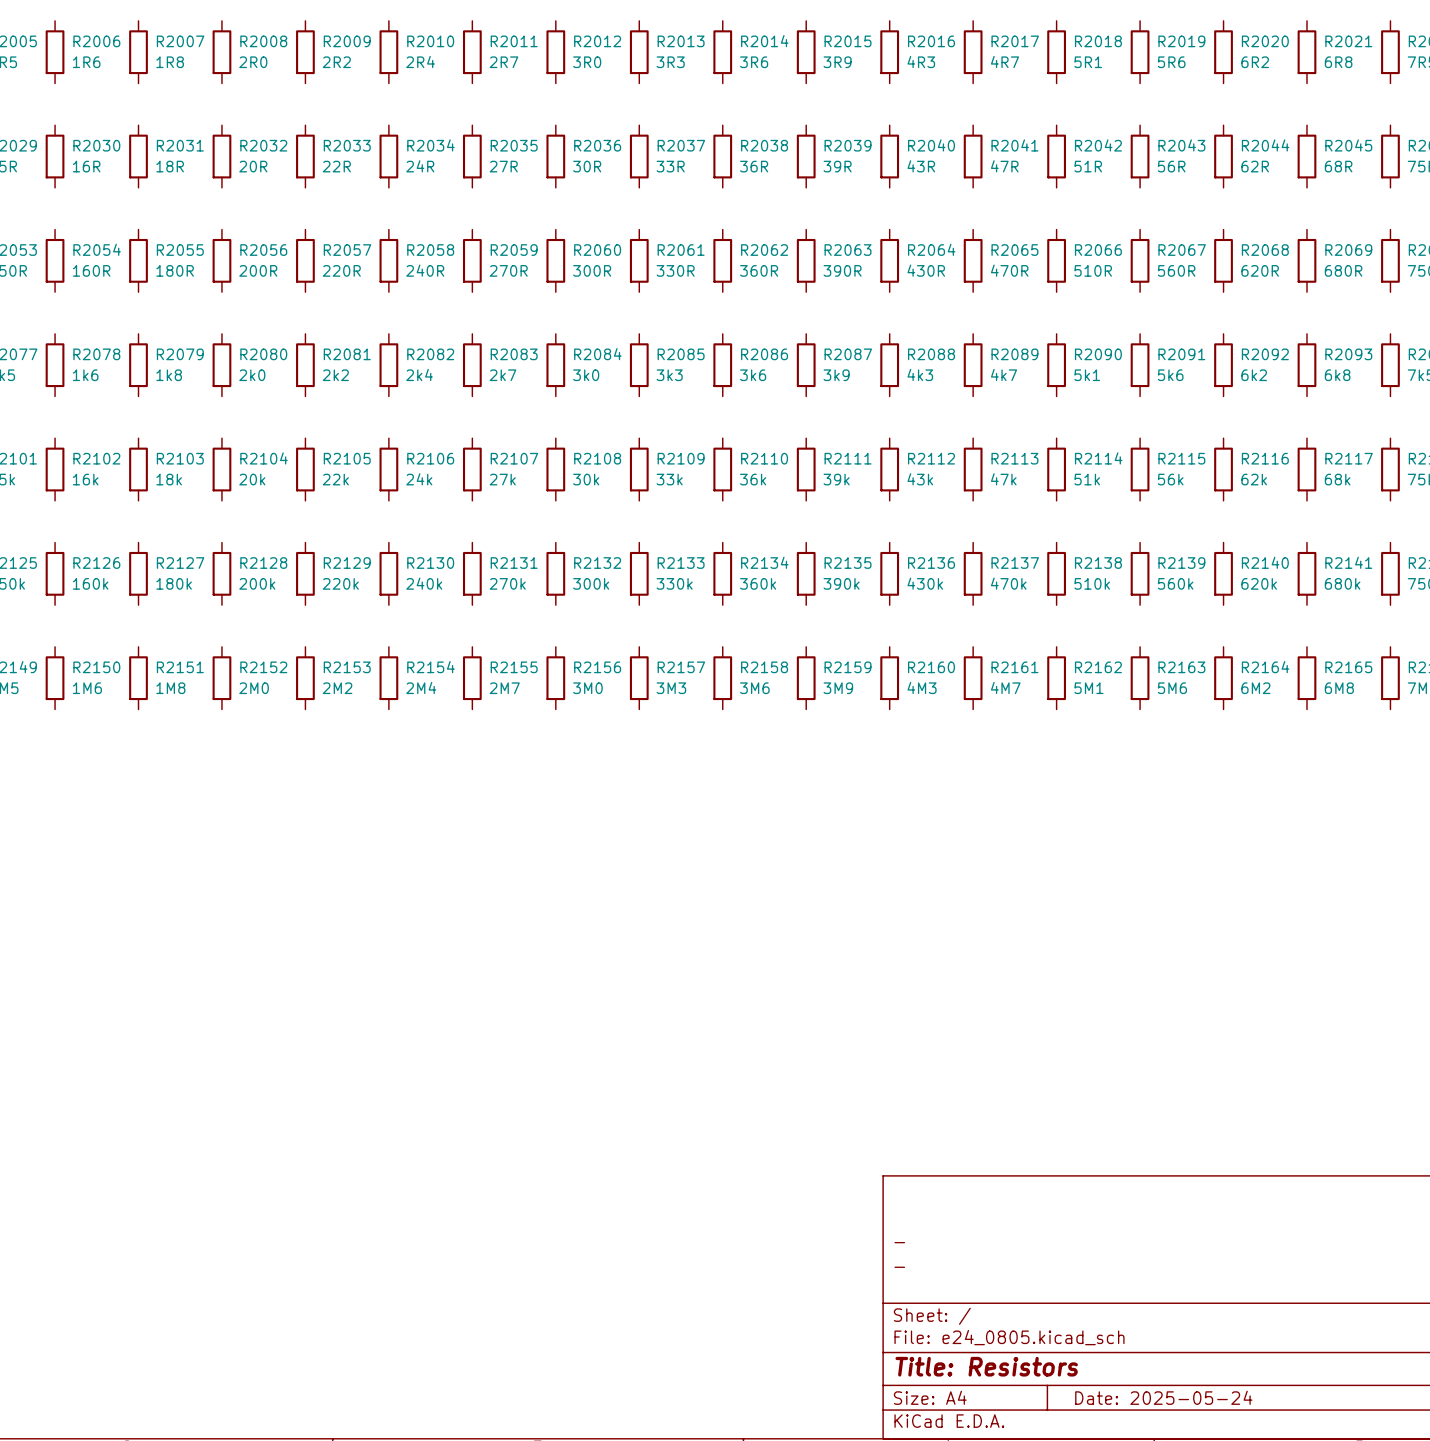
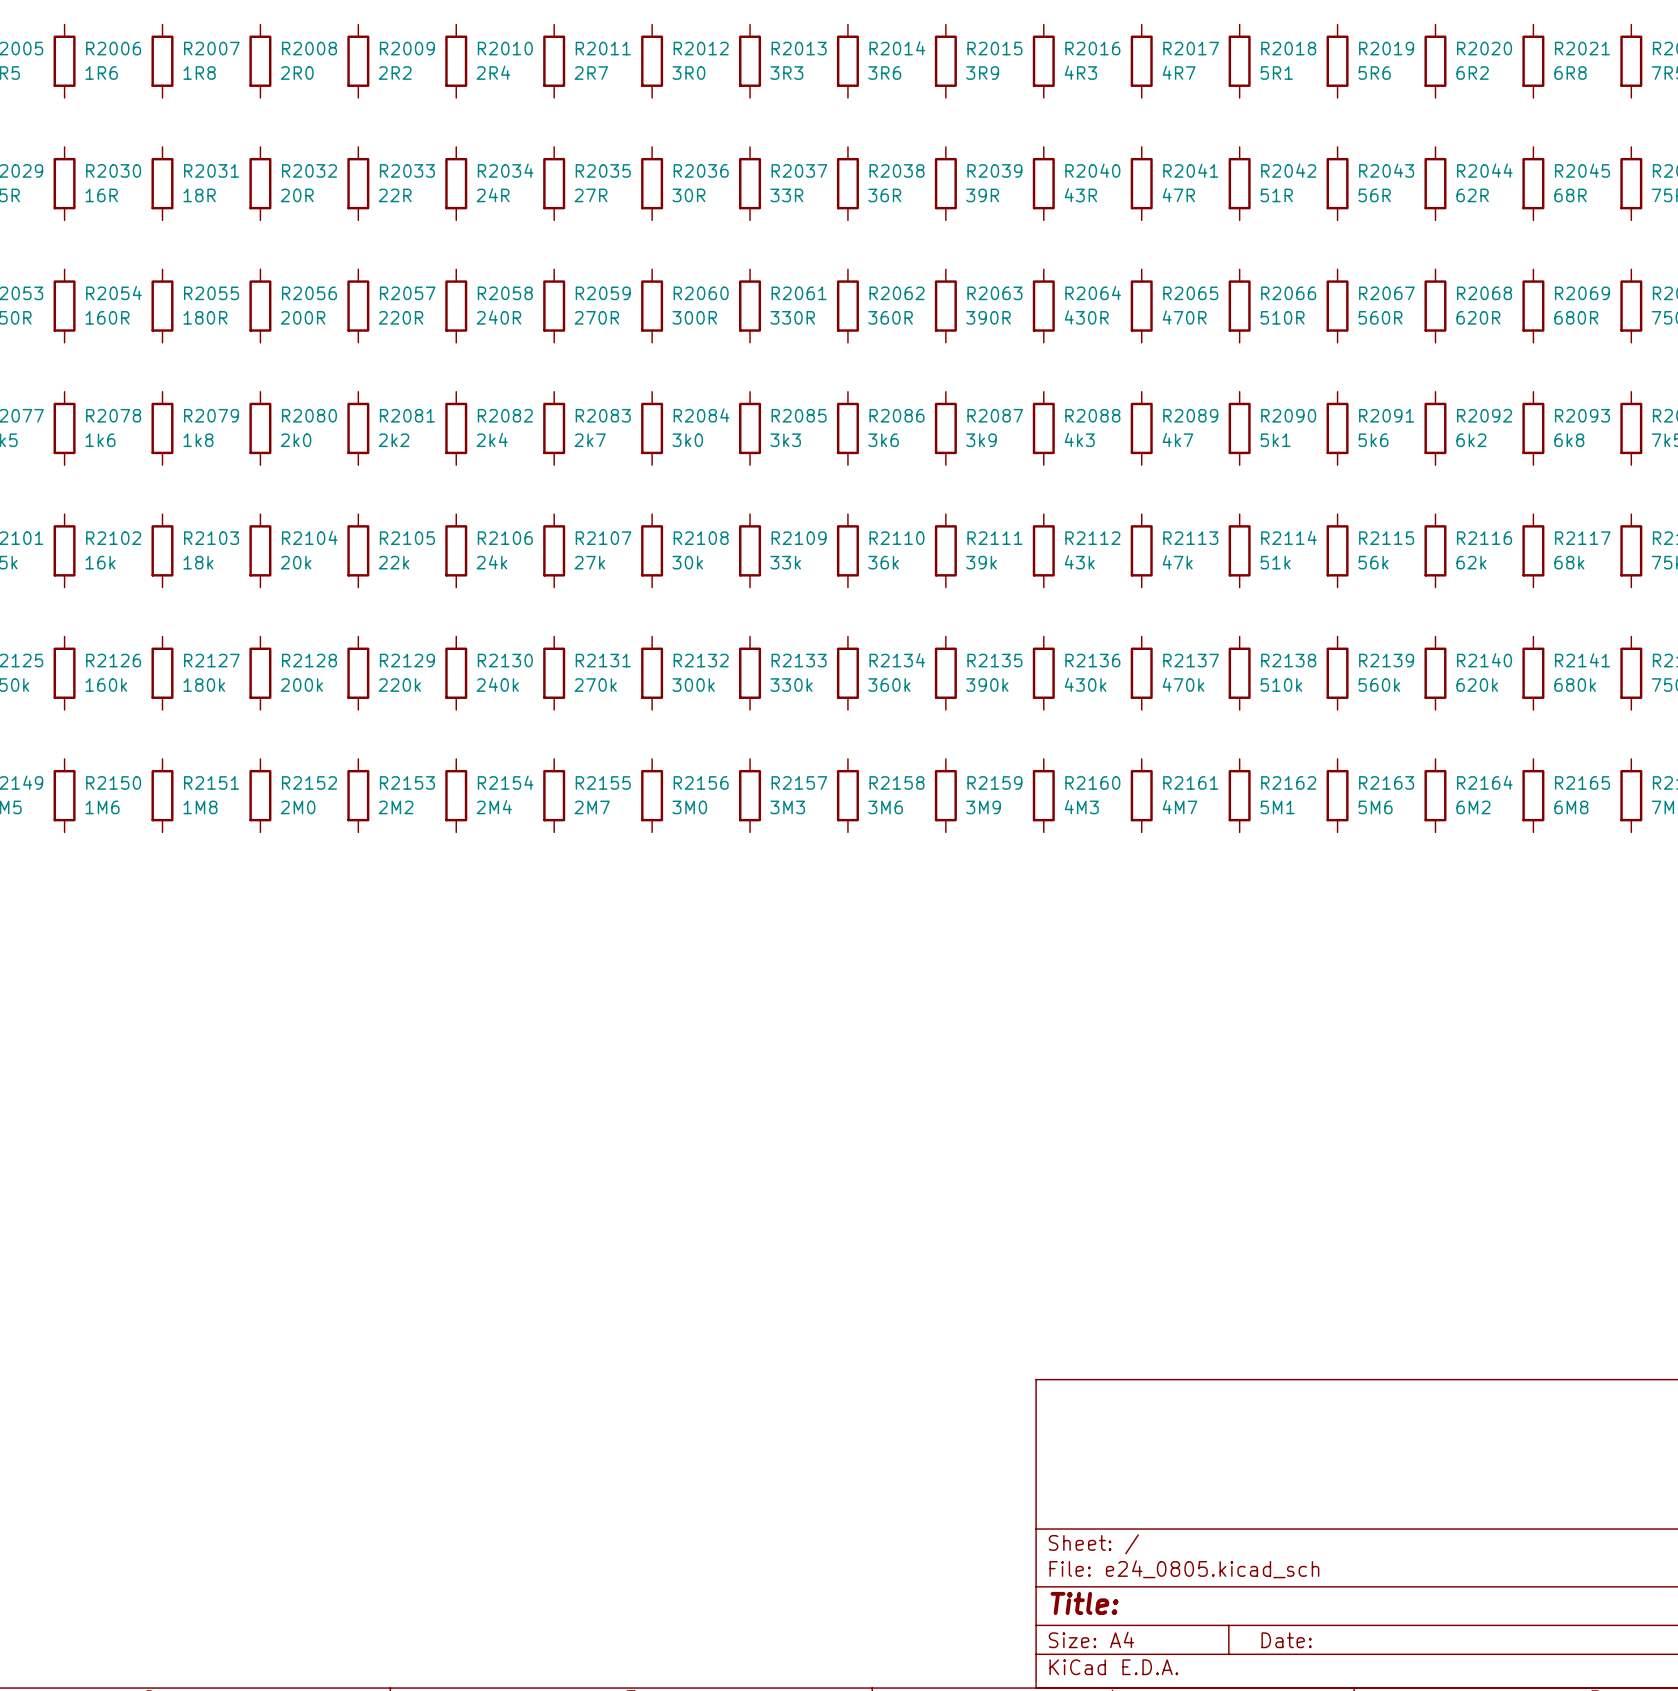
title block: - (899, 1242) -> none
title block: - (899, 1267) -> none
title block: Title: Resistors (986, 1366) -> Title: (1084, 1603)
title block: Date: 2025-05-24 (1163, 1397) -> Date: (1286, 1640)

